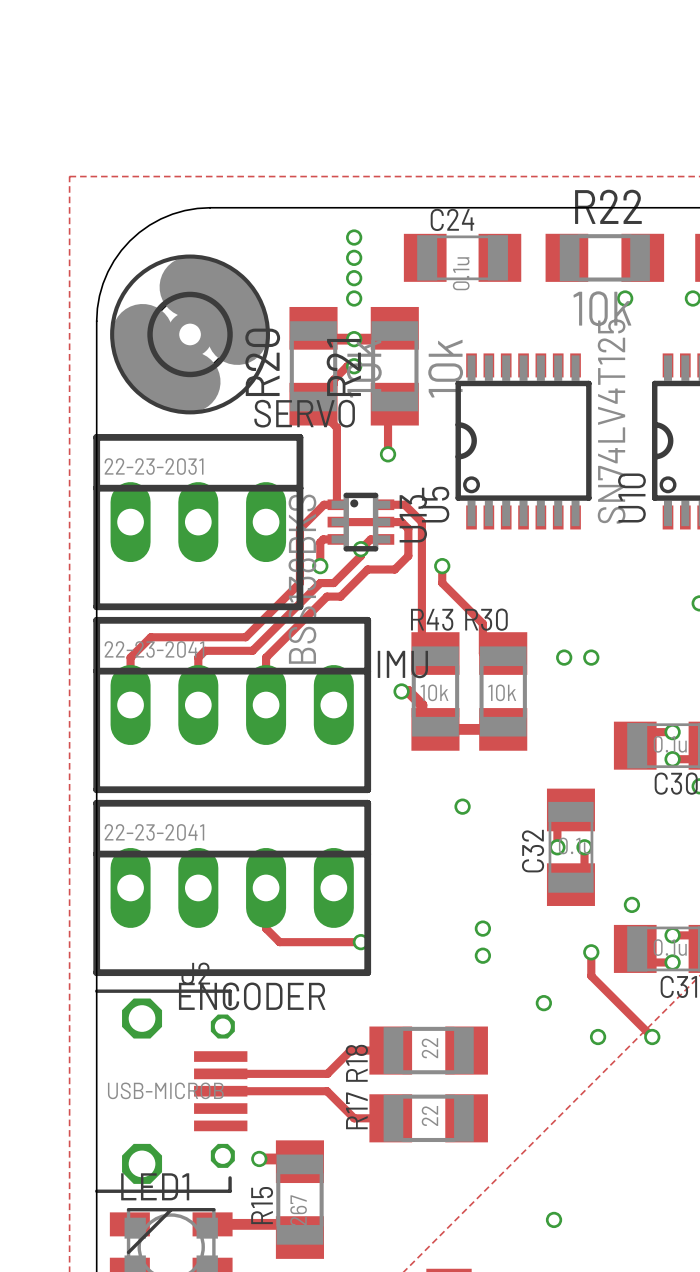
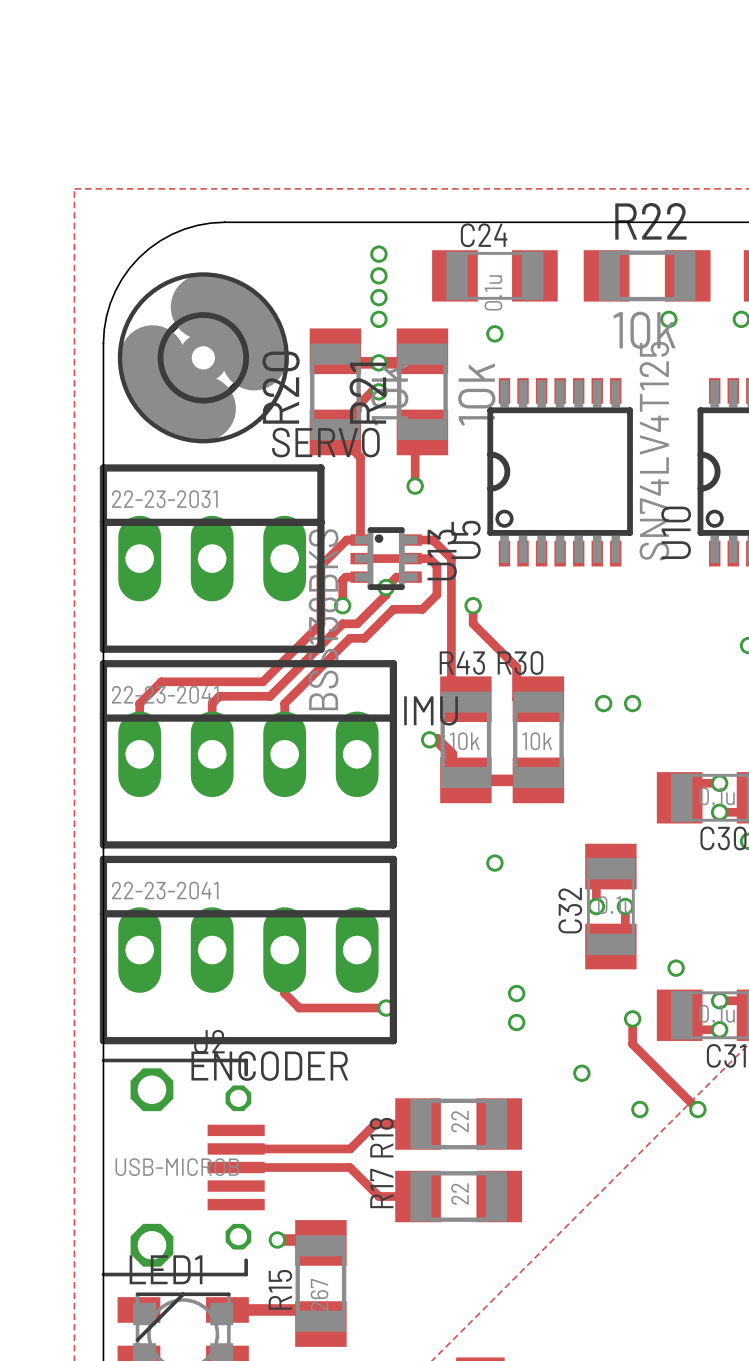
via: none -> (494, 333)
via: (554, 1219) -> none

